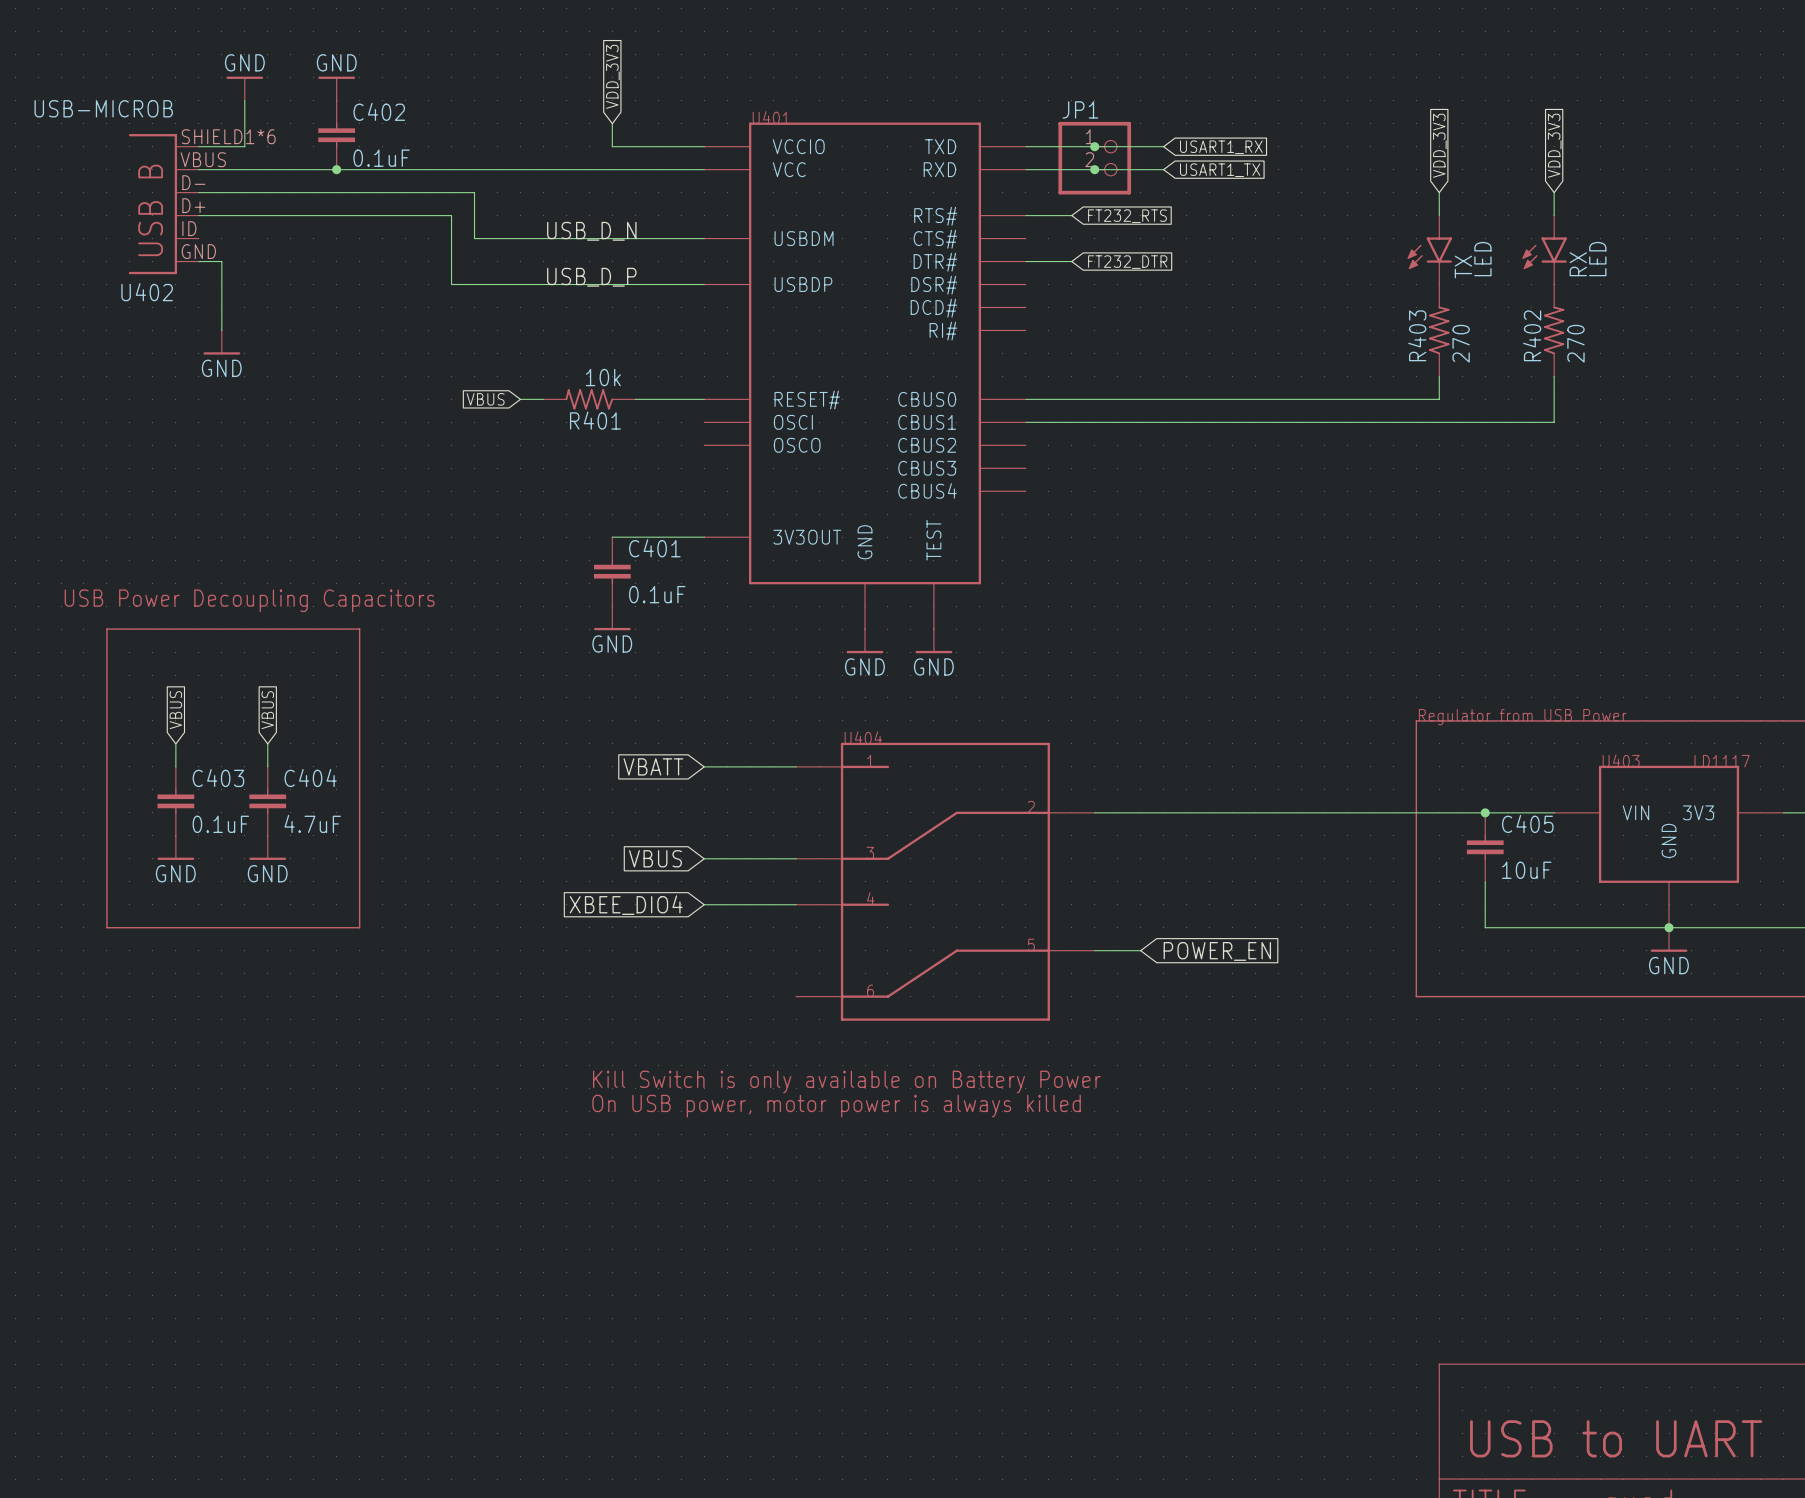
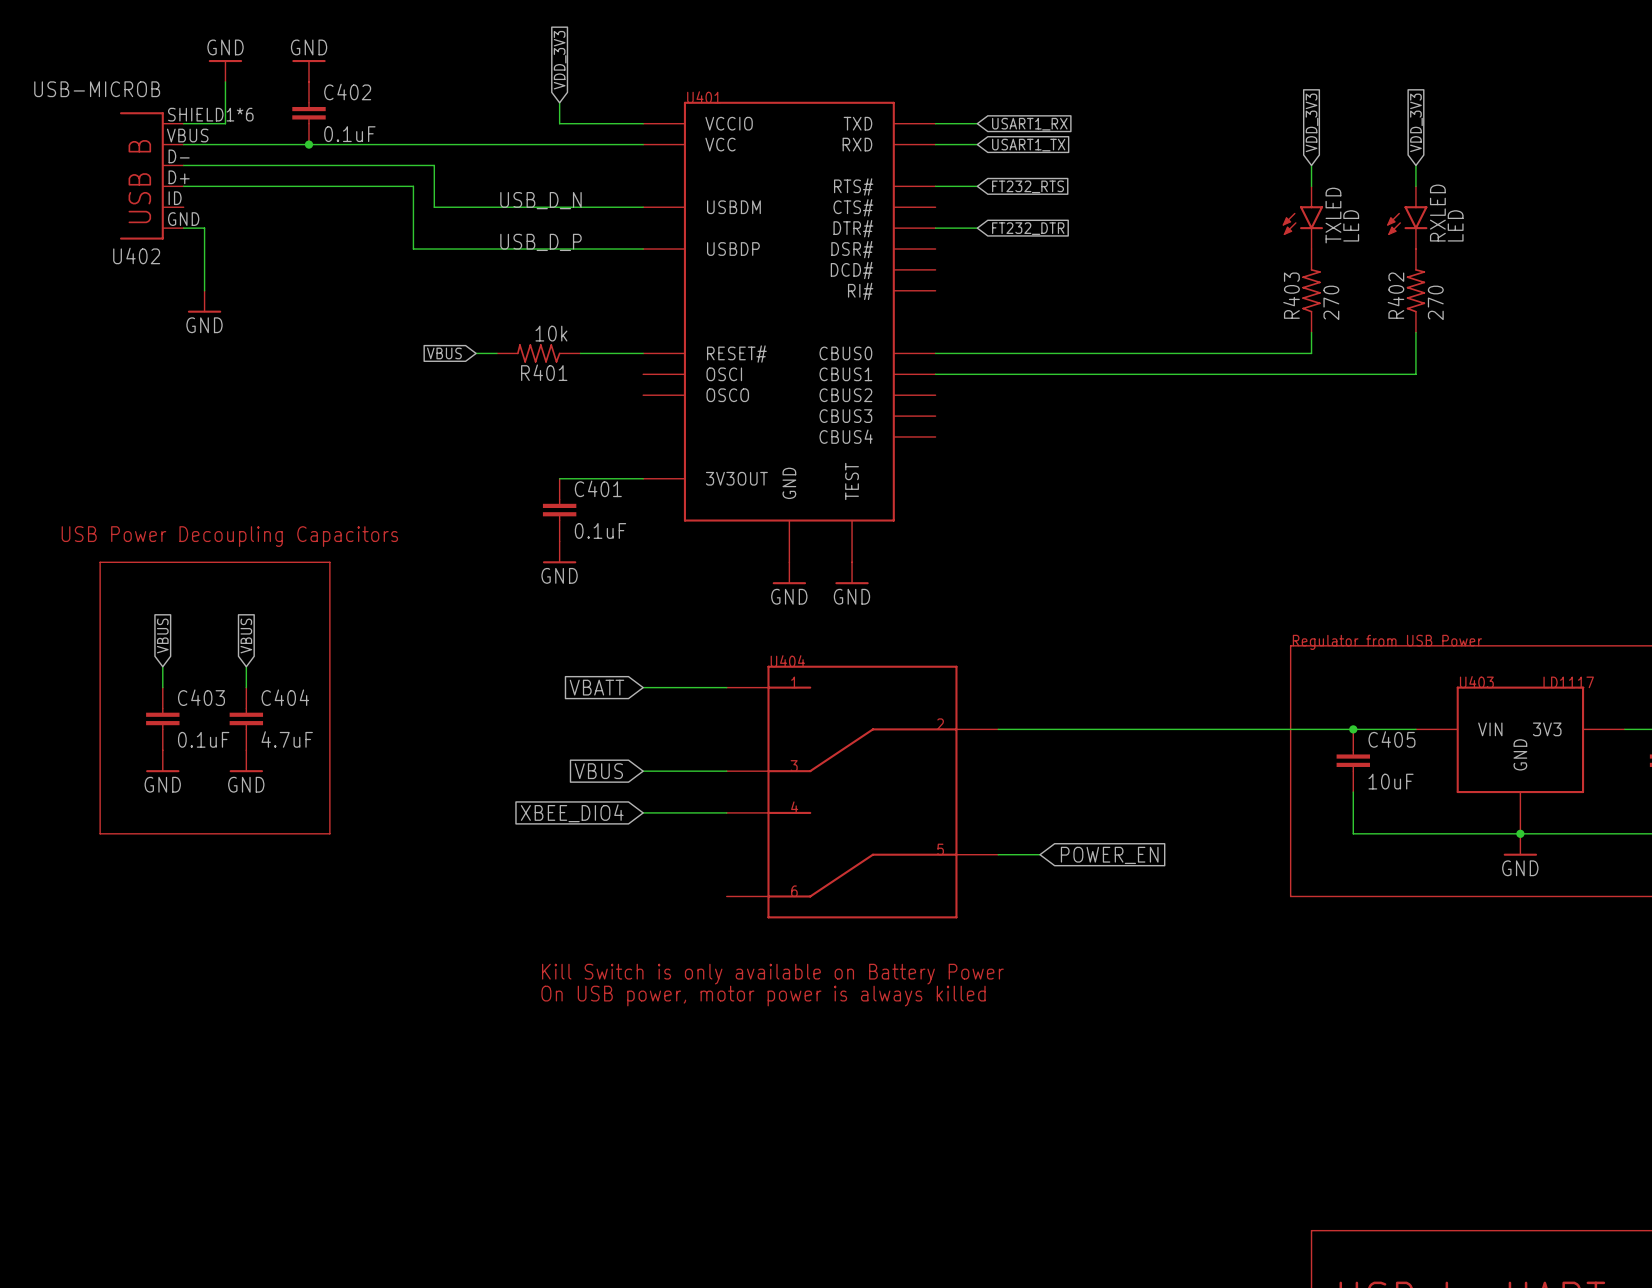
wire: (1071, 146) (1163, 146) -> none
junction: (1094, 146) -> none
global label position: USART1_RX (1221, 147) -> USART1_RX (1029, 124)
JP1: (1094, 158) -> none
wire: (1071, 169) (1163, 169) -> none
junction: (1094, 169) -> none
global label position: USART1_TX (1220, 170) -> USART1_TX (1028, 145)
RX name: RX (1578, 264) -> RXLED (1437, 213)
TX name: TX (1463, 267) -> TXLED (1333, 215)

